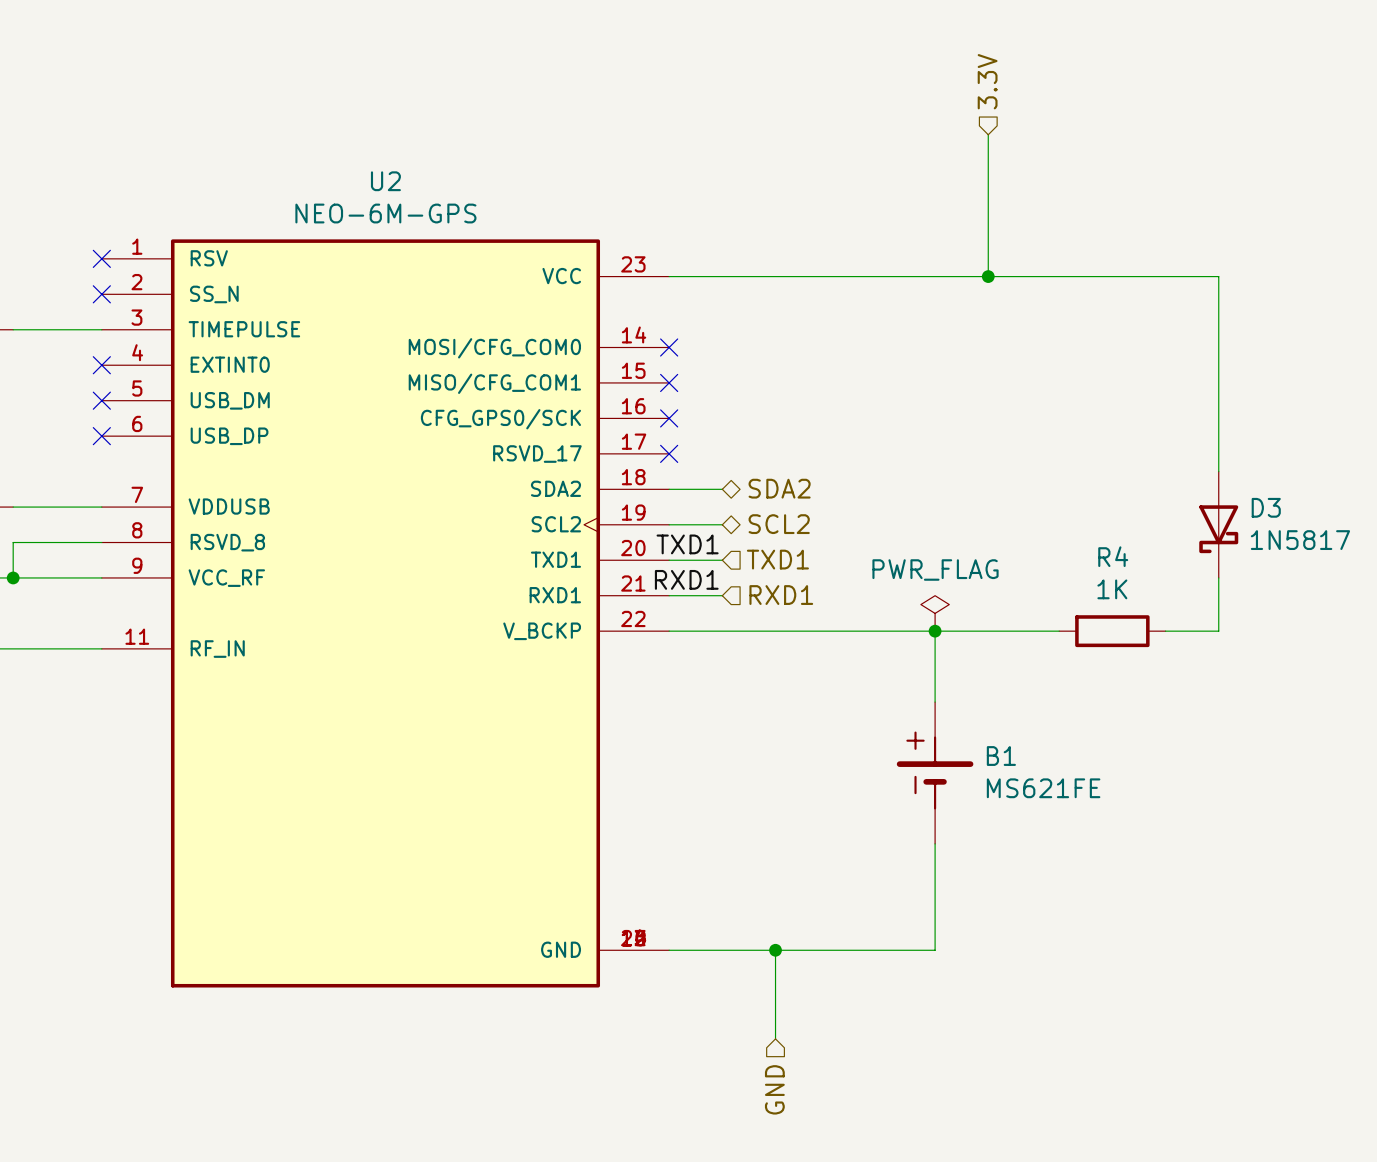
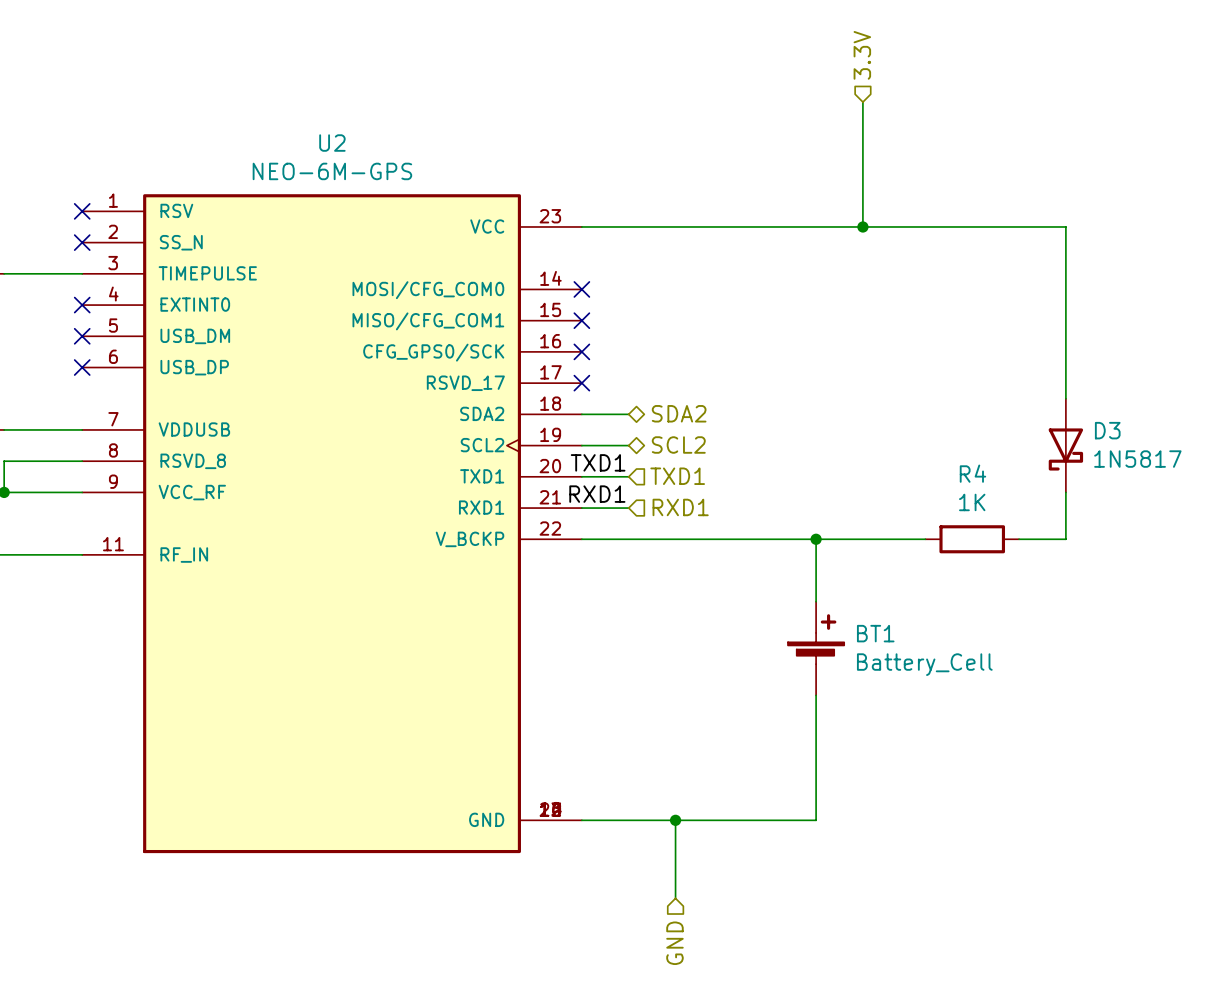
power symbol: PWR_FLAG (935, 613) -> none
BT1: none -> Battery_Cell (816, 648)
B1: MS621FE (935, 772) -> none

